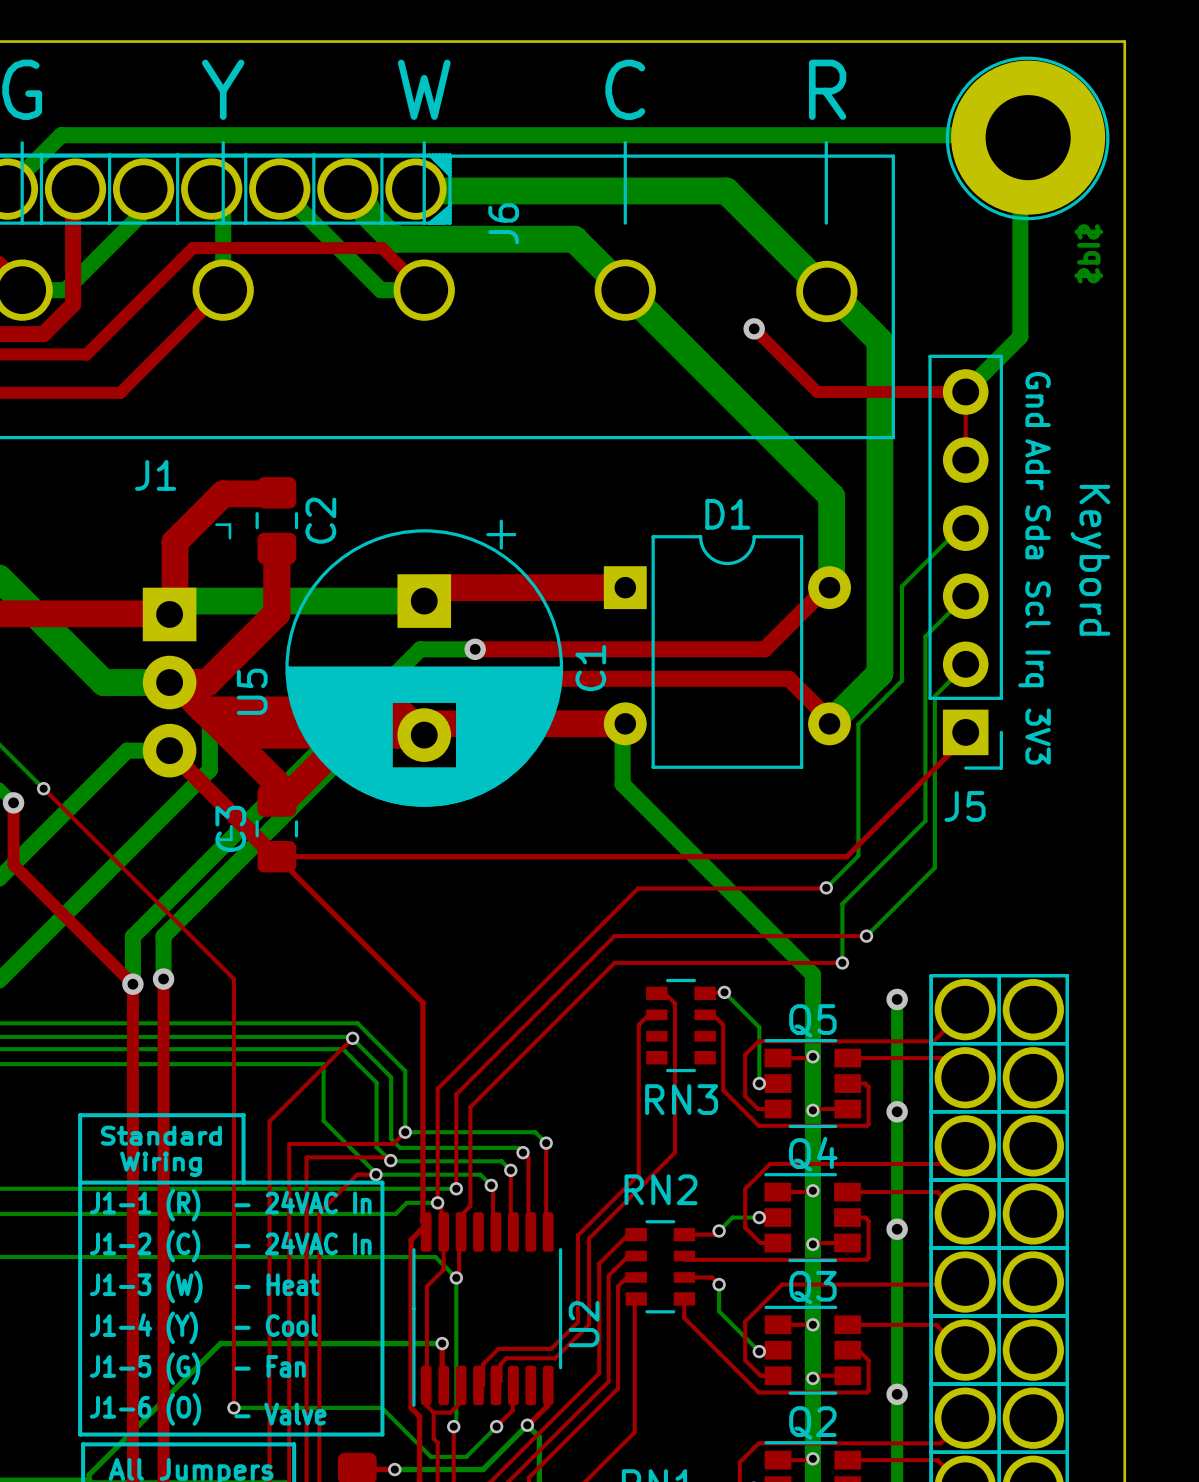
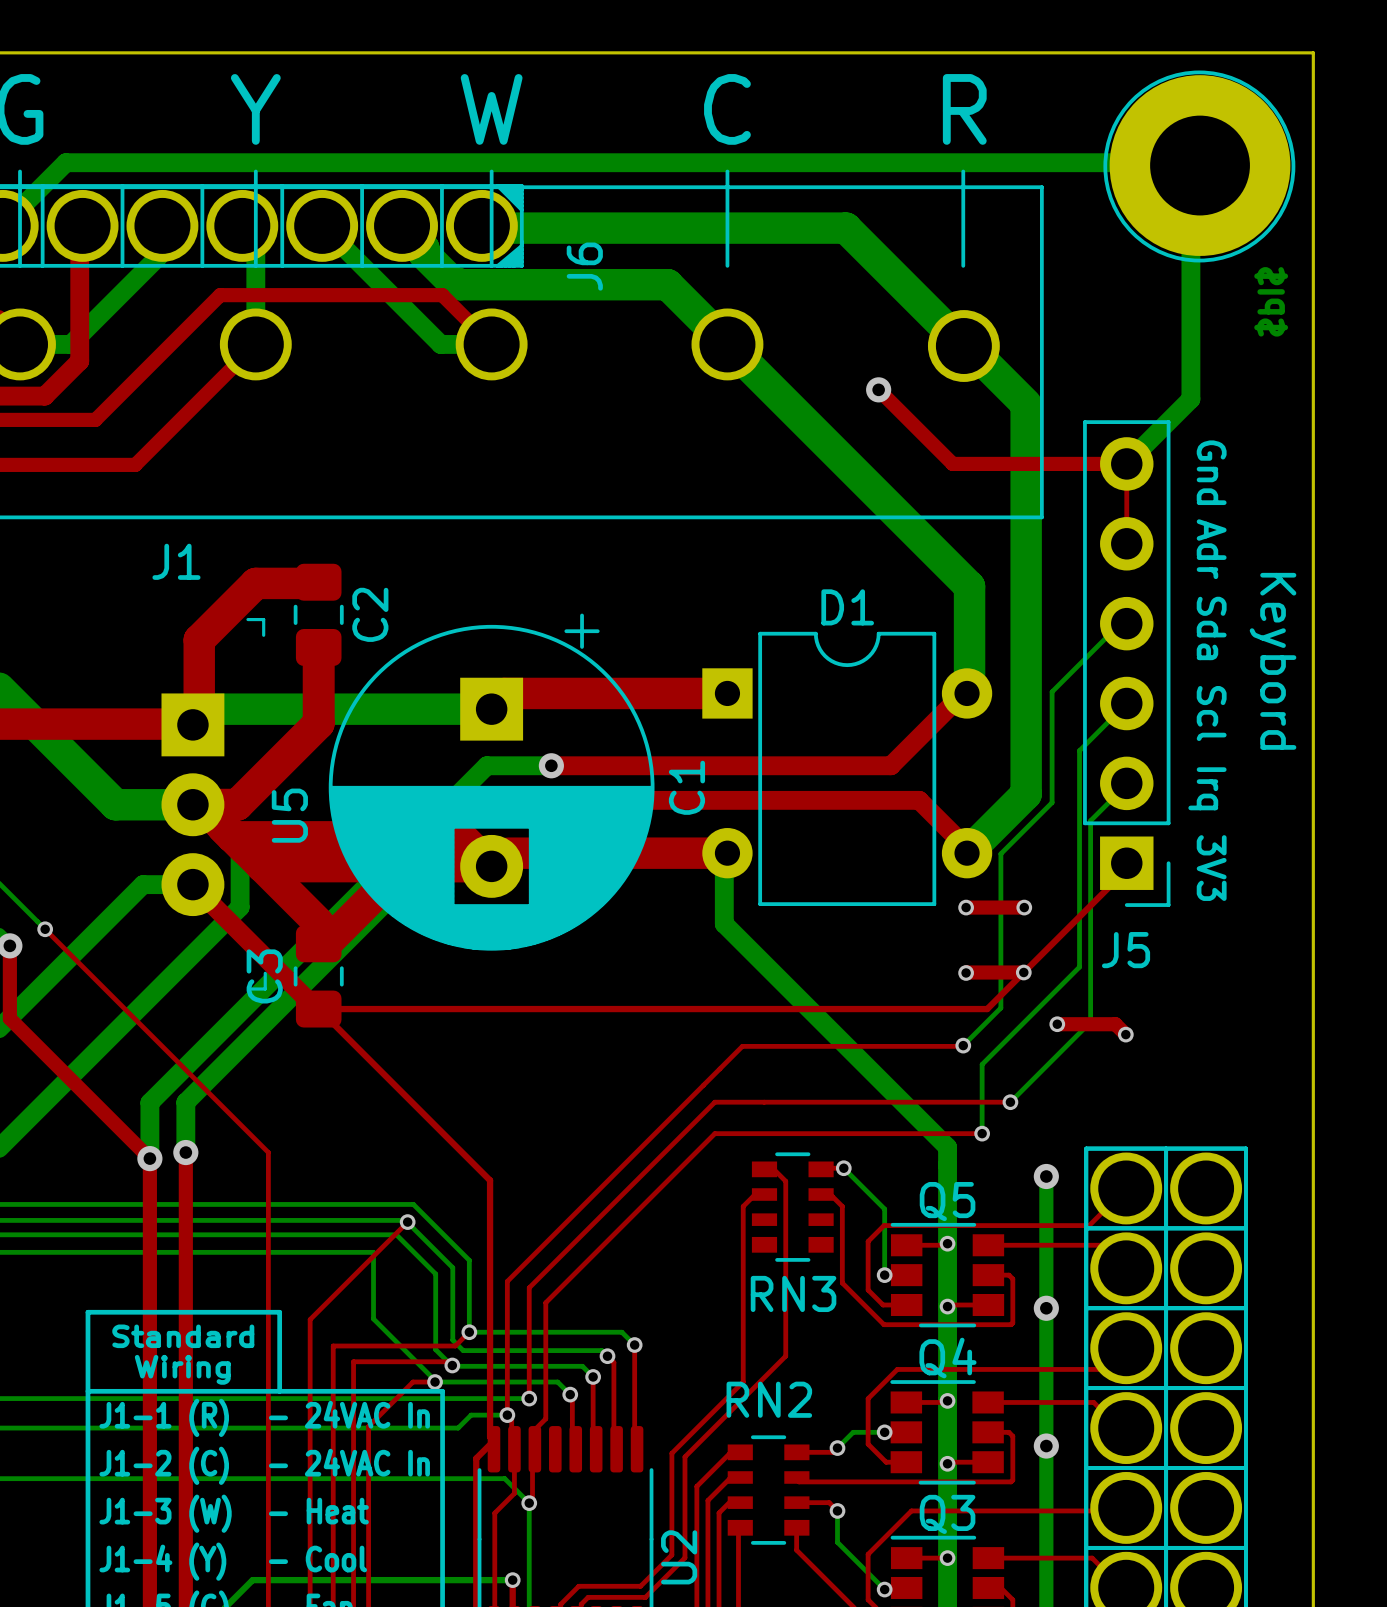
top track: none -> (966, 907) (1024, 907)
via: none -> (966, 907)
via: none -> (1024, 907)
via: none -> (966, 972)
top track: none -> (1023, 972) (966, 972)
via: none -> (1023, 972)
top track: none -> (1057, 1024) (1115, 1024) (1125, 1034)
via: none -> (1057, 1024)
via: none -> (1125, 1034)

